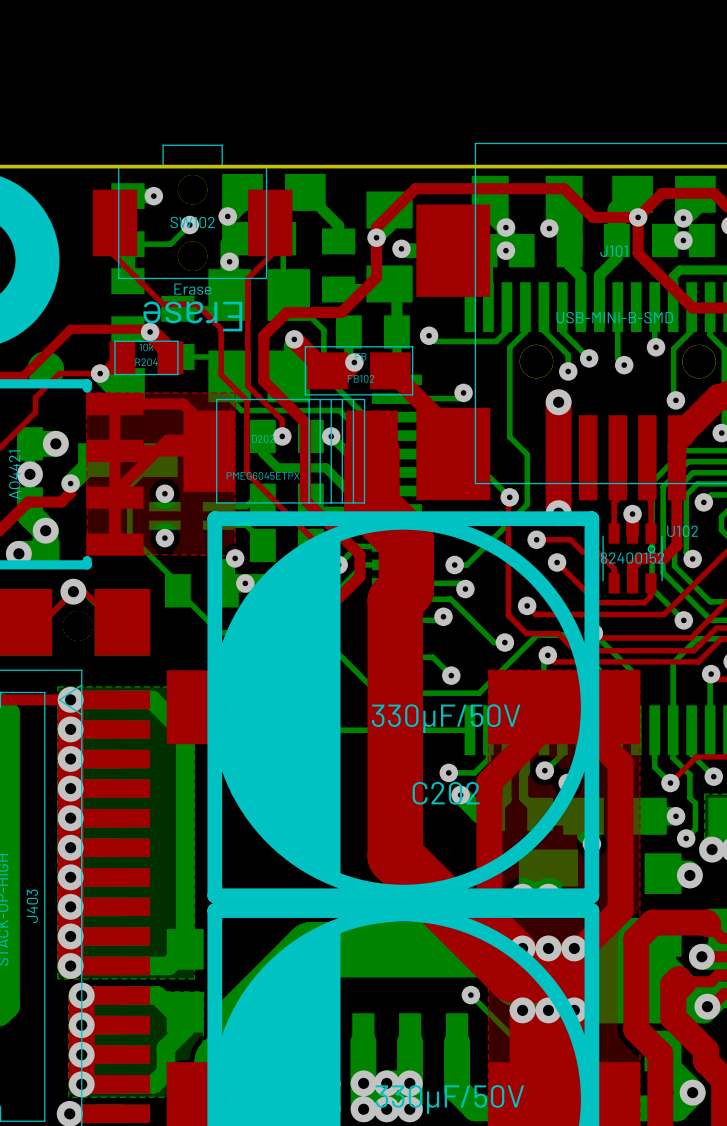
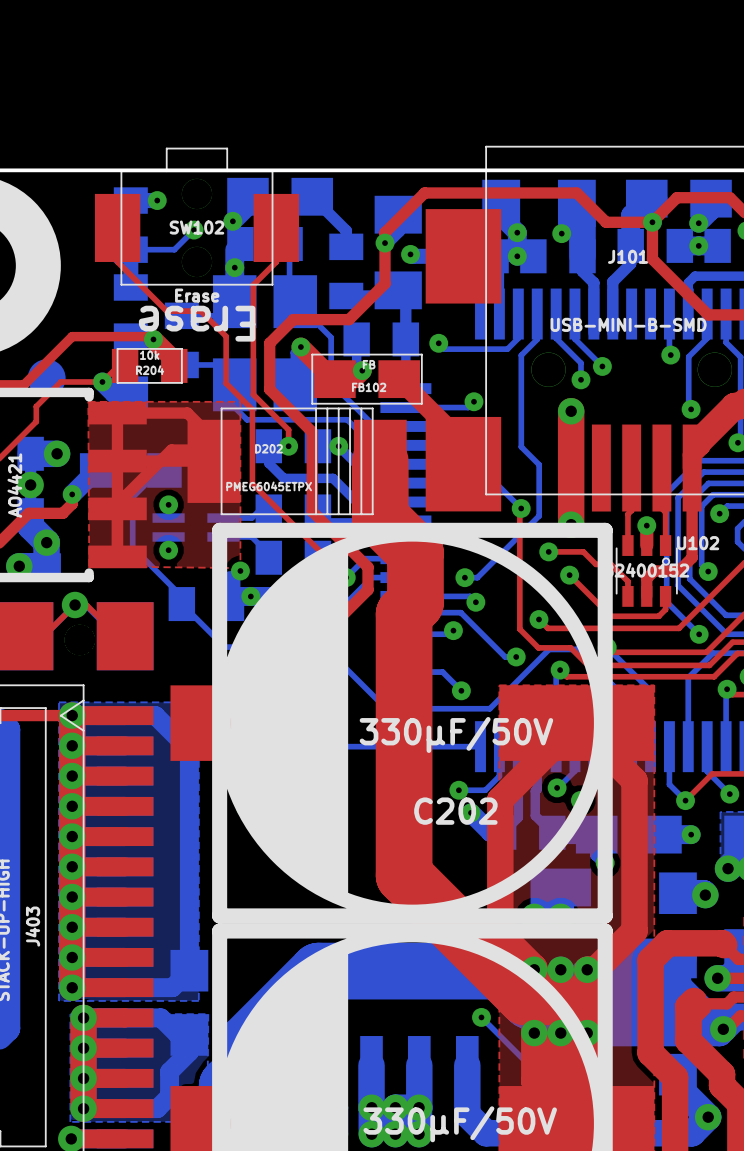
bottom track: (617, 307) (617, 358) (624, 365) -> none
via: (624, 365) -> none
bottom track: (673, 730) (673, 757) (689, 774) (689, 797) (695, 803) (695, 829) (686, 838) -> none
via: (686, 838) -> none

